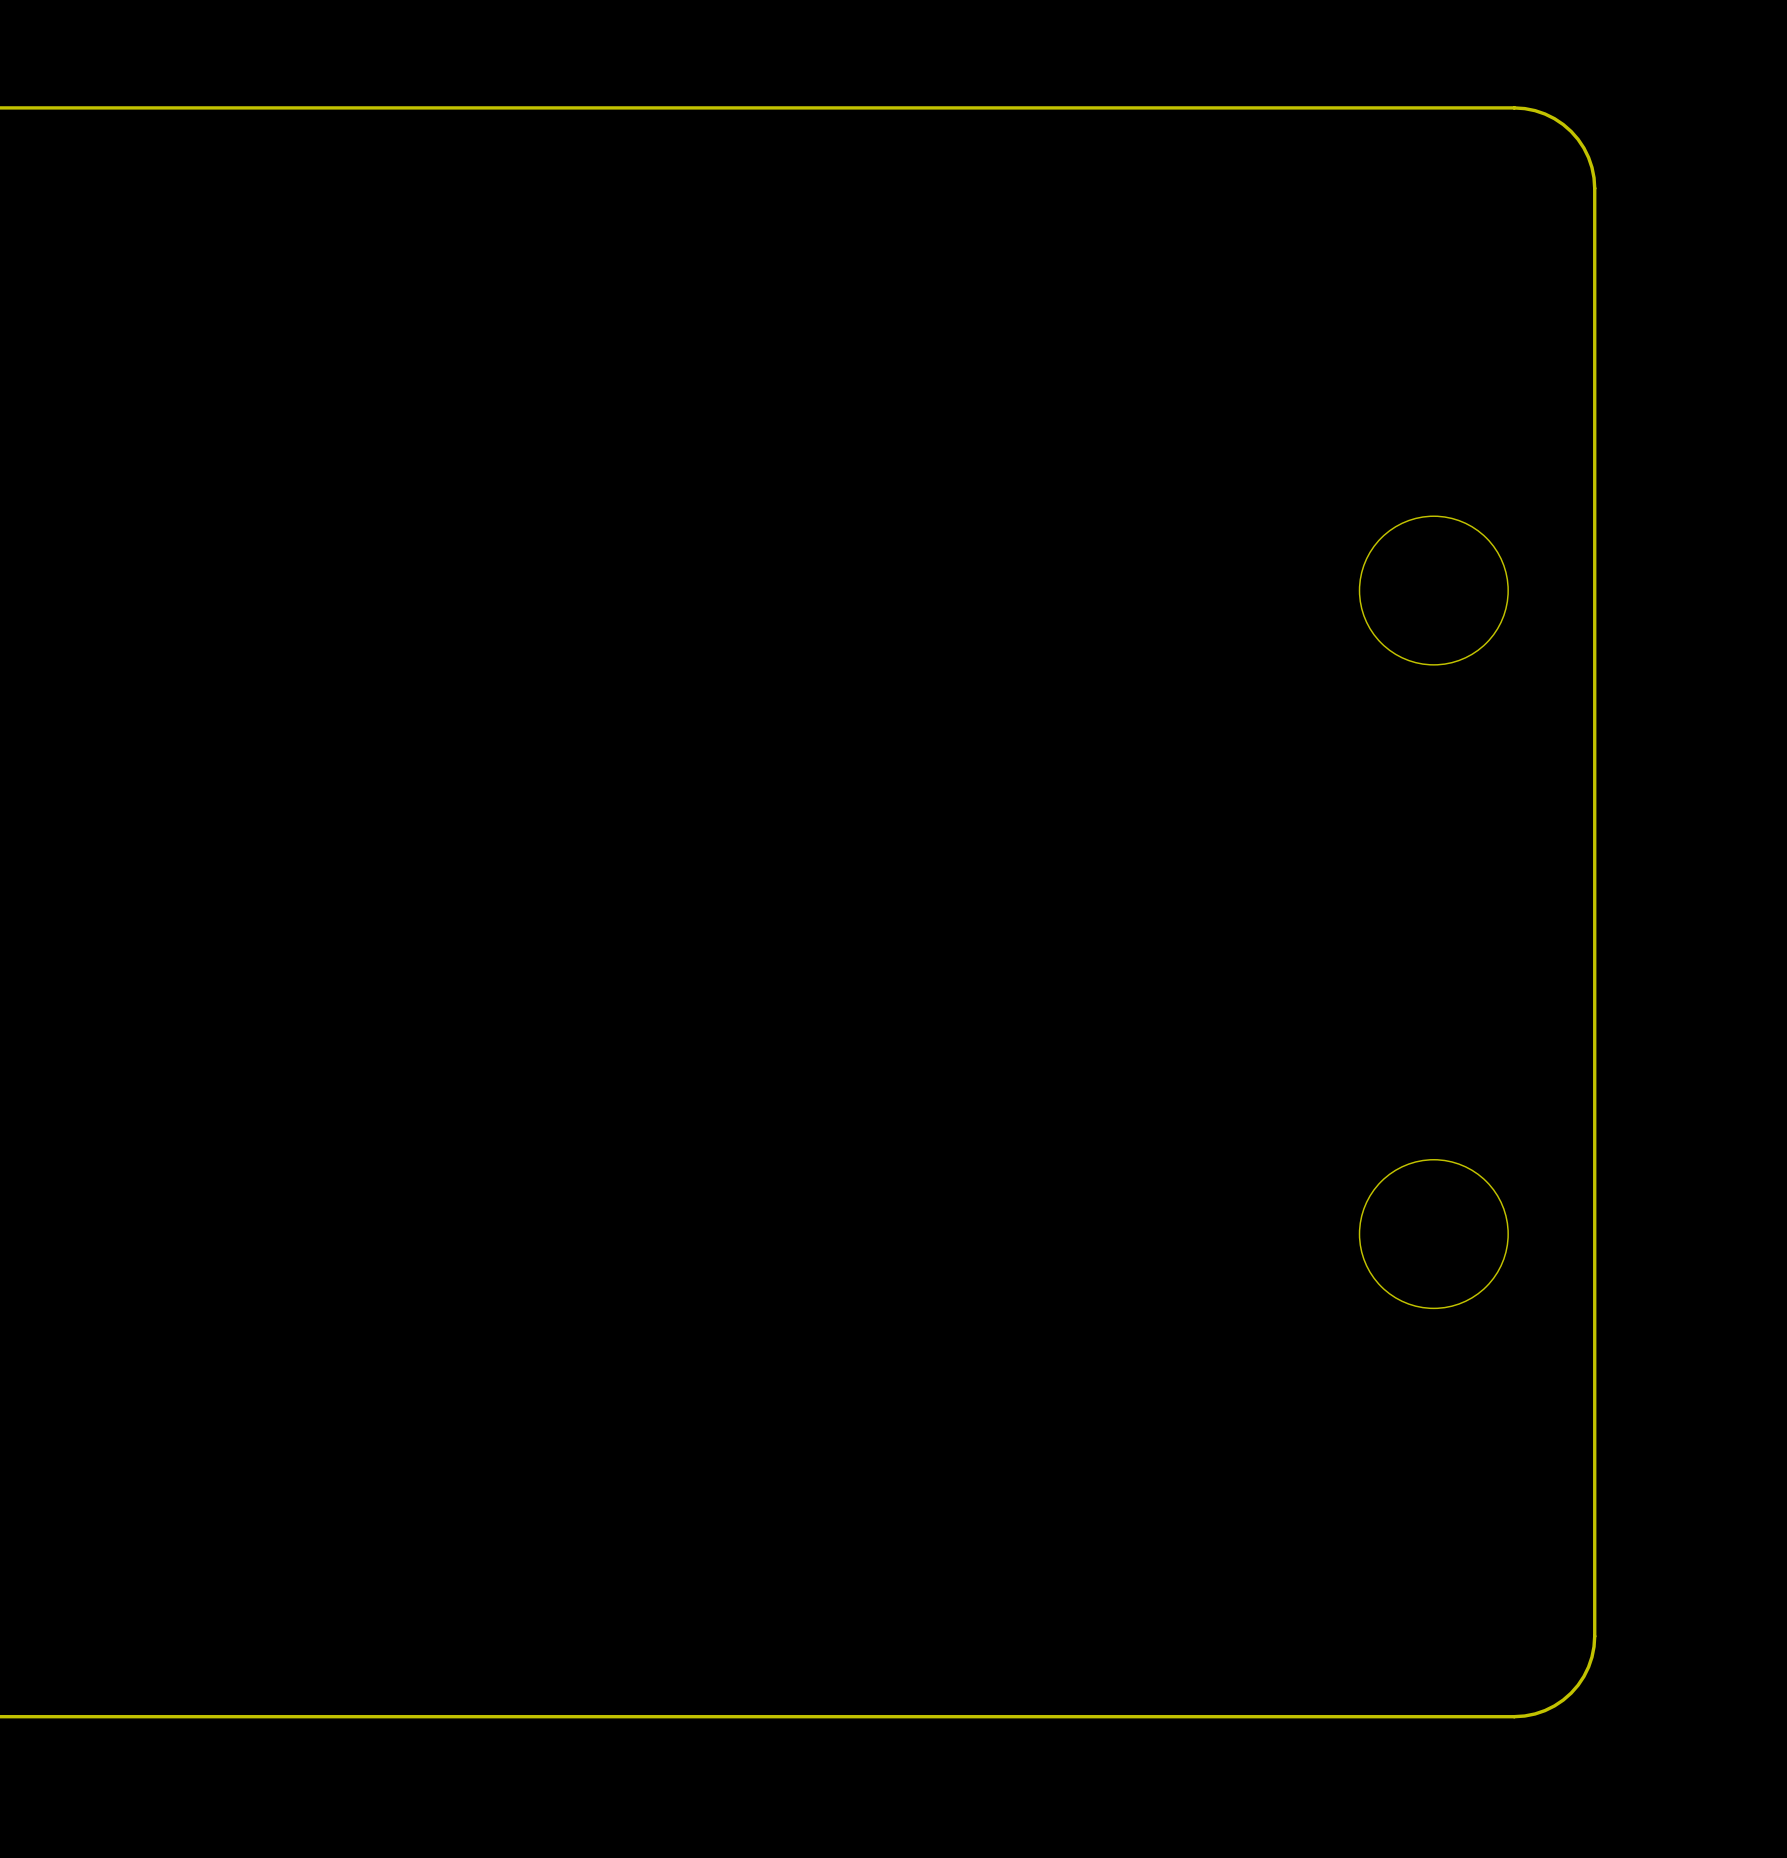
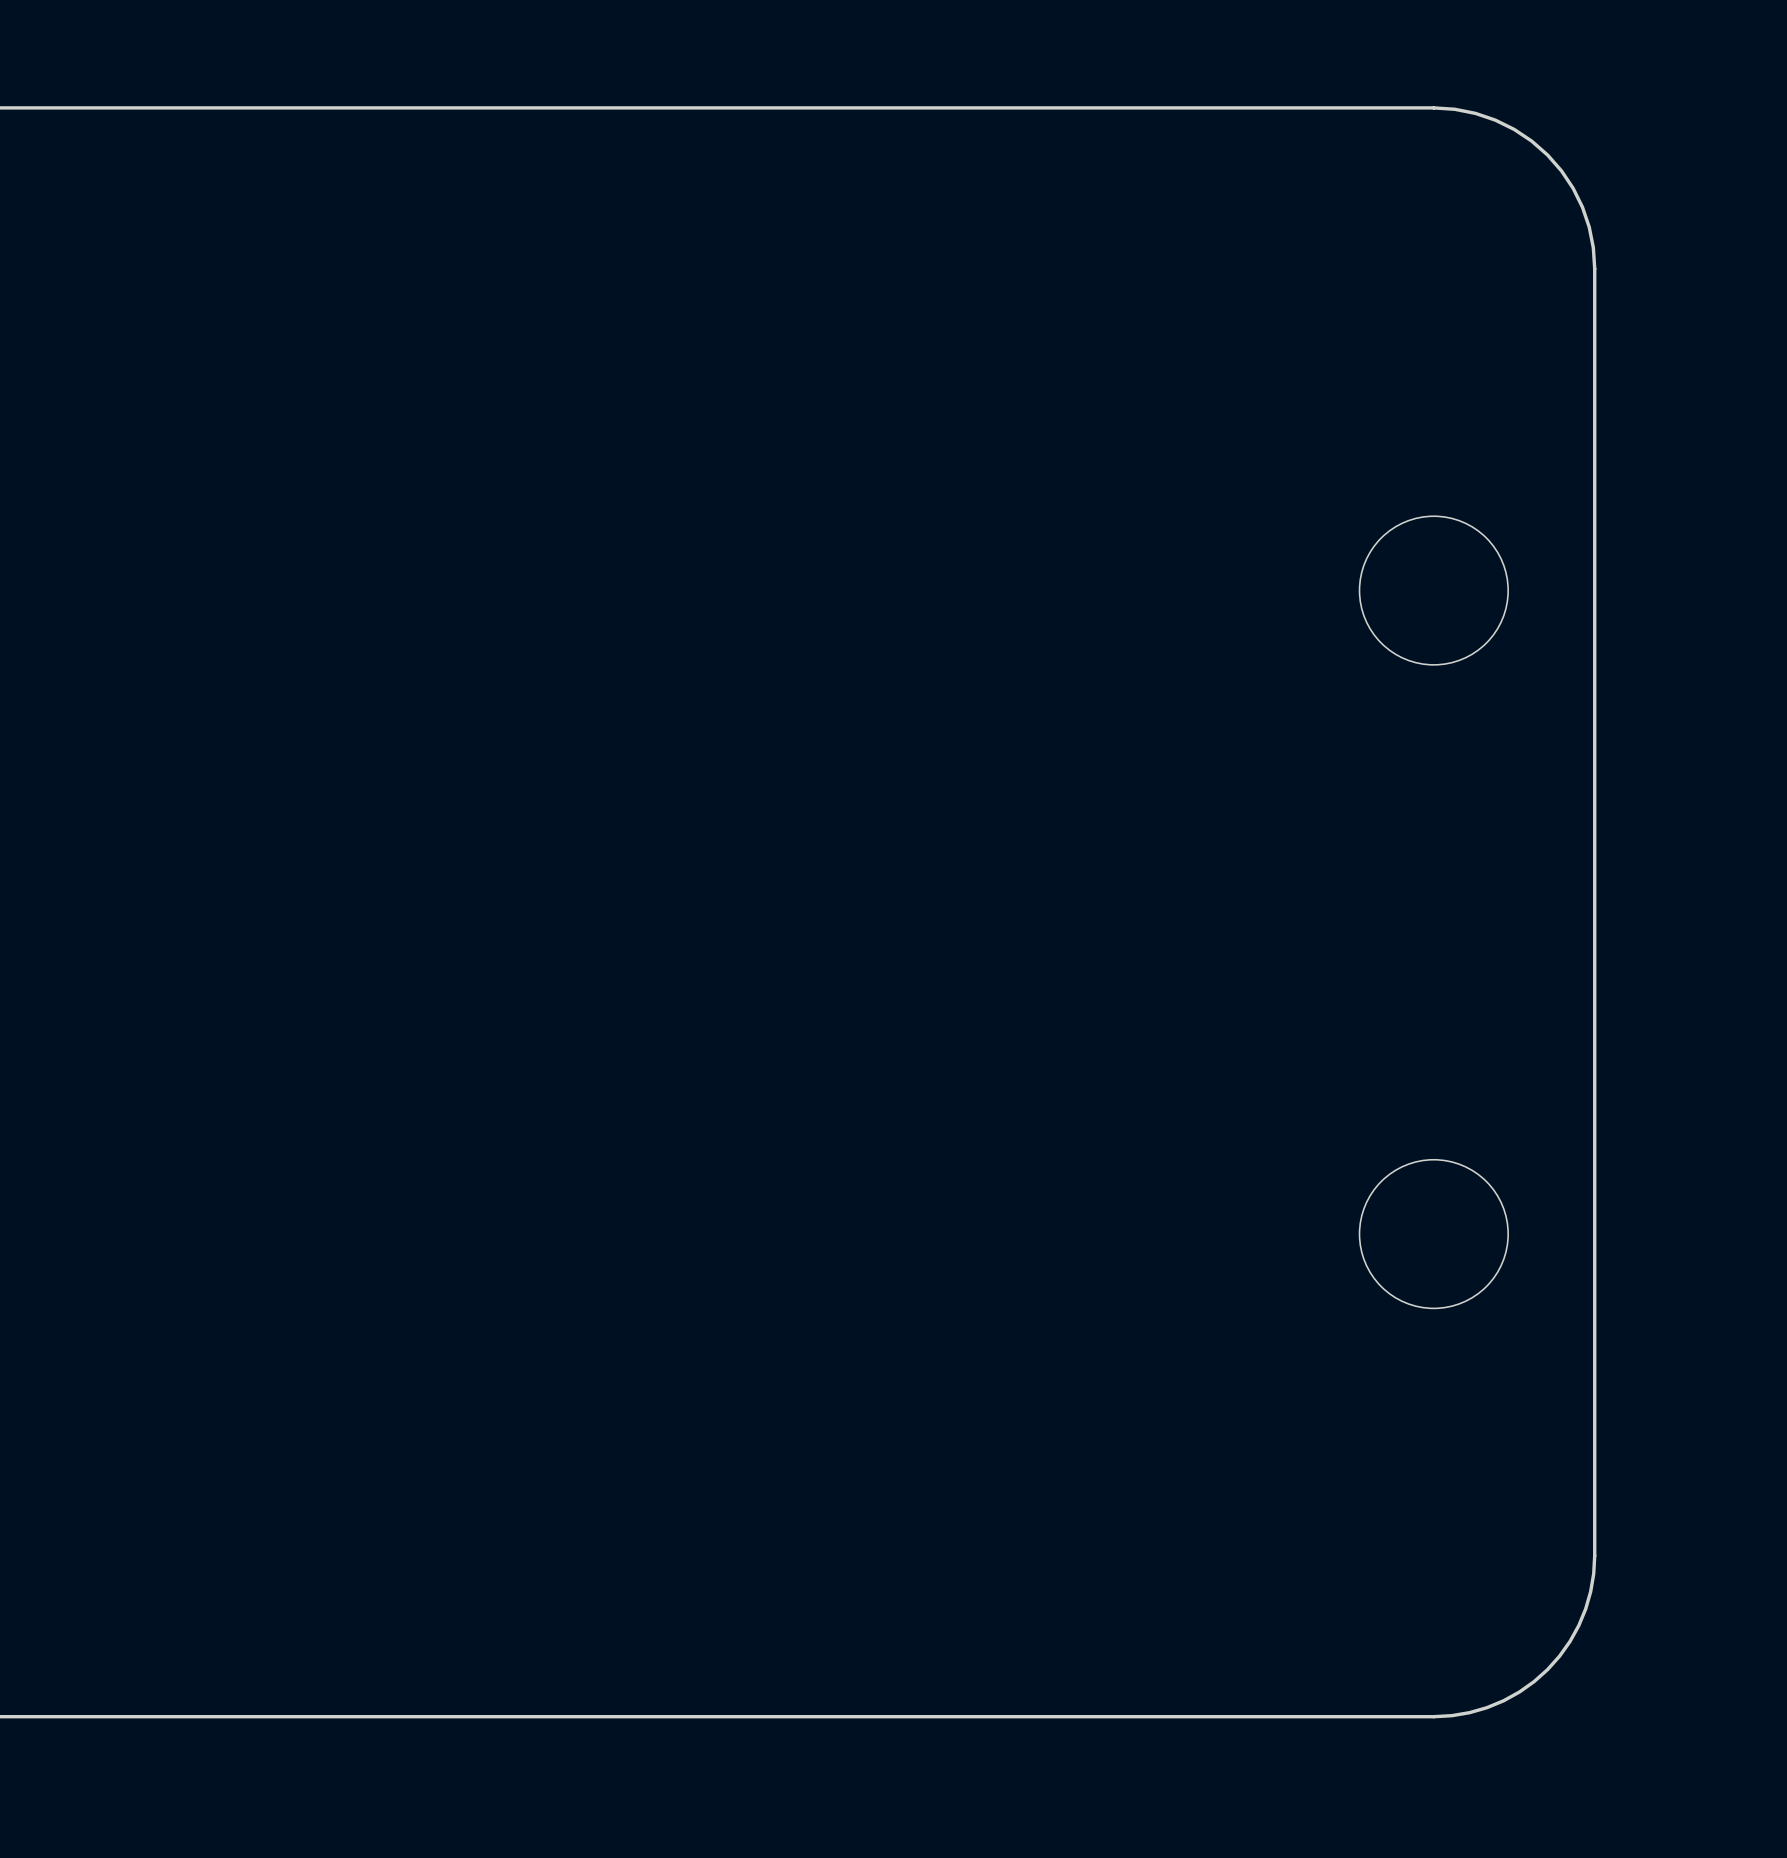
board edge: (1433, 107) (1524, 108) (1545, 114) (1571, 131) (1588, 157) (1594, 177) (1594, 268) -> (1433, 107) (1475, 113) (1495, 120) (1514, 129) (1547, 155) (1561, 170) (1582, 207) (1593, 247) (1594, 268)
board edge: (1594, 1555) (1594, 1646) (1583, 1676) (1571, 1693) (1554, 1705) (1524, 1716) (1433, 1716) -> (1594, 1555) (1593, 1573) (1585, 1608) (1570, 1641) (1547, 1669) (1519, 1692) (1503, 1700) (1469, 1712) (1433, 1716)

